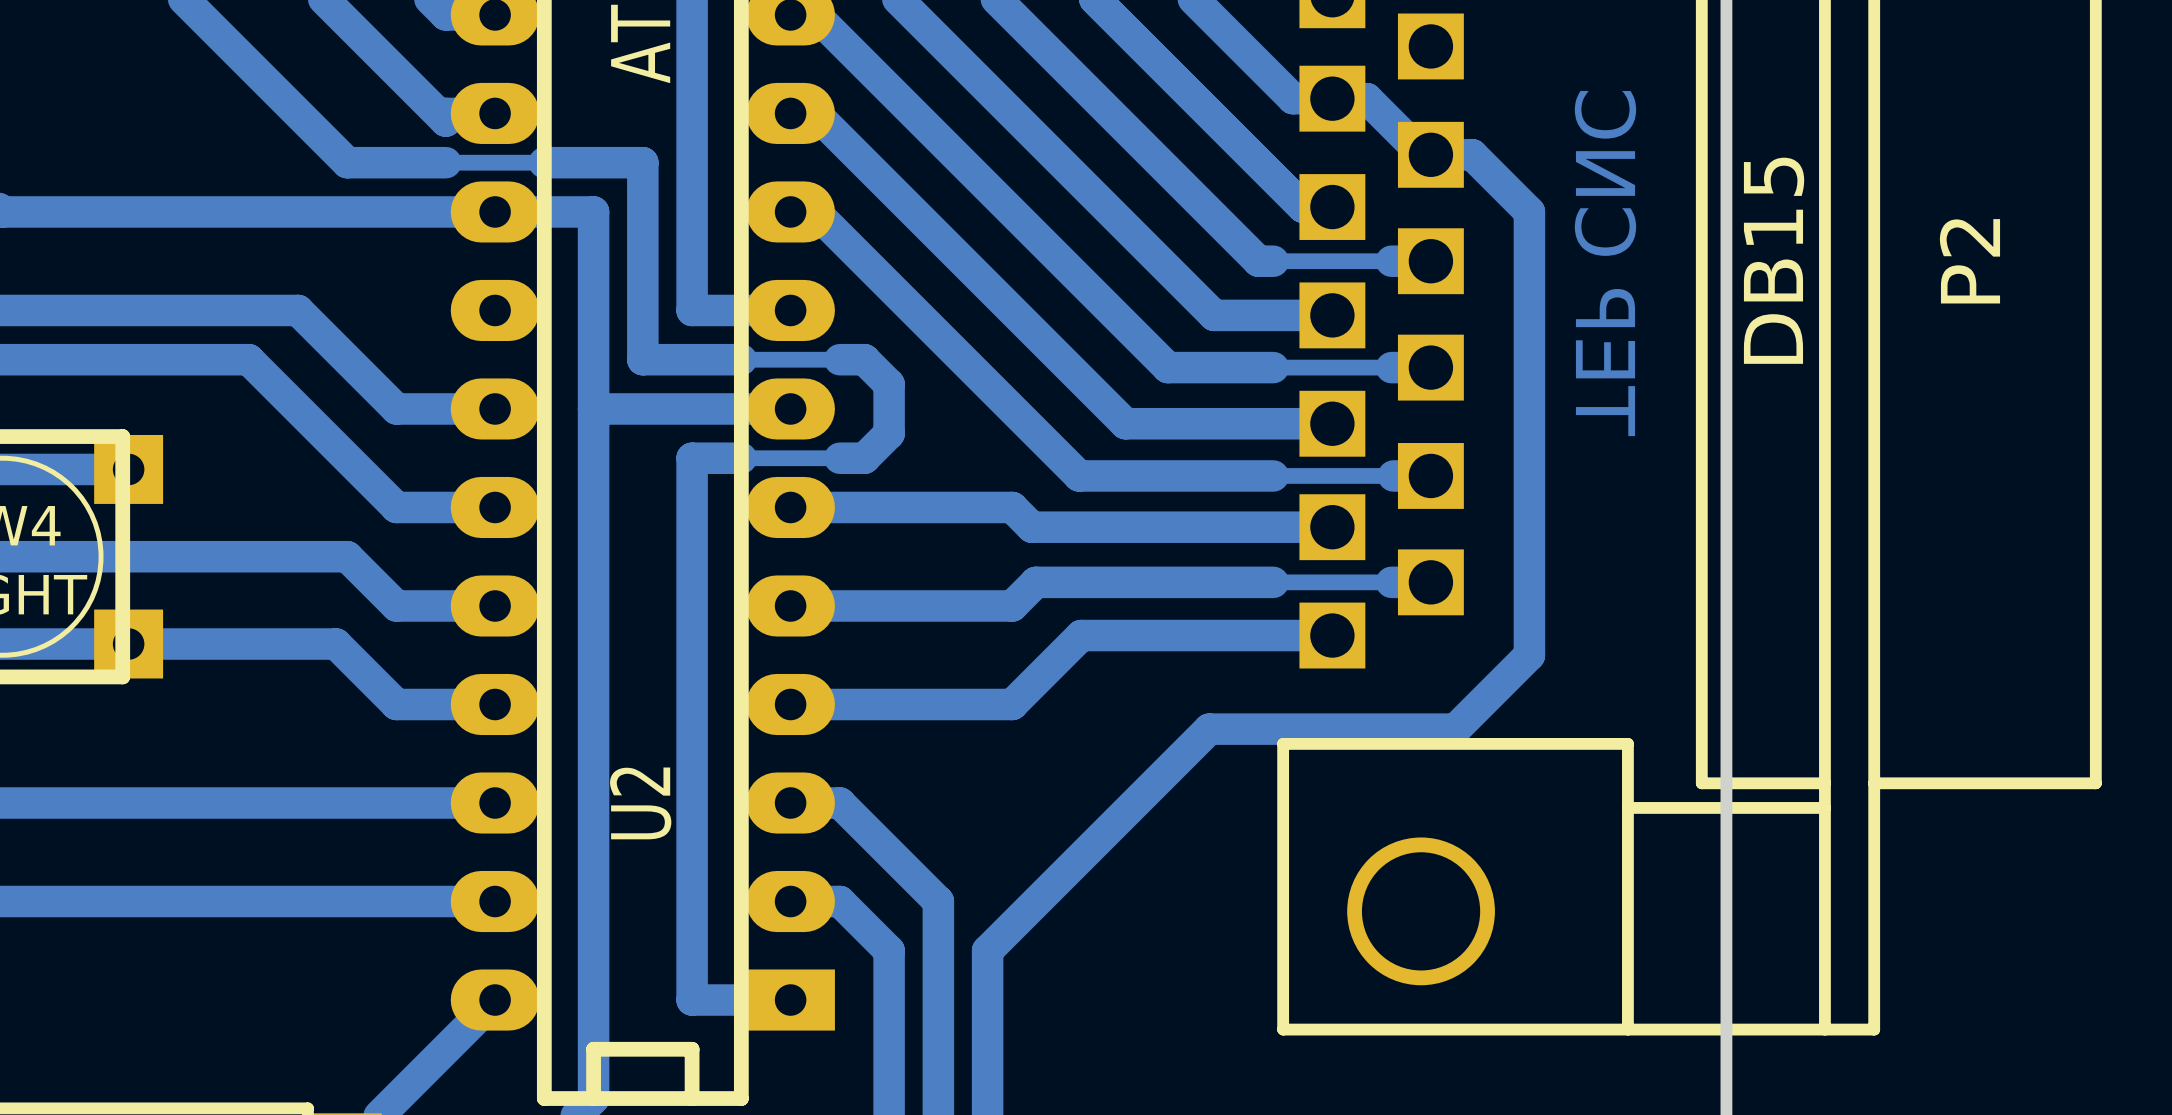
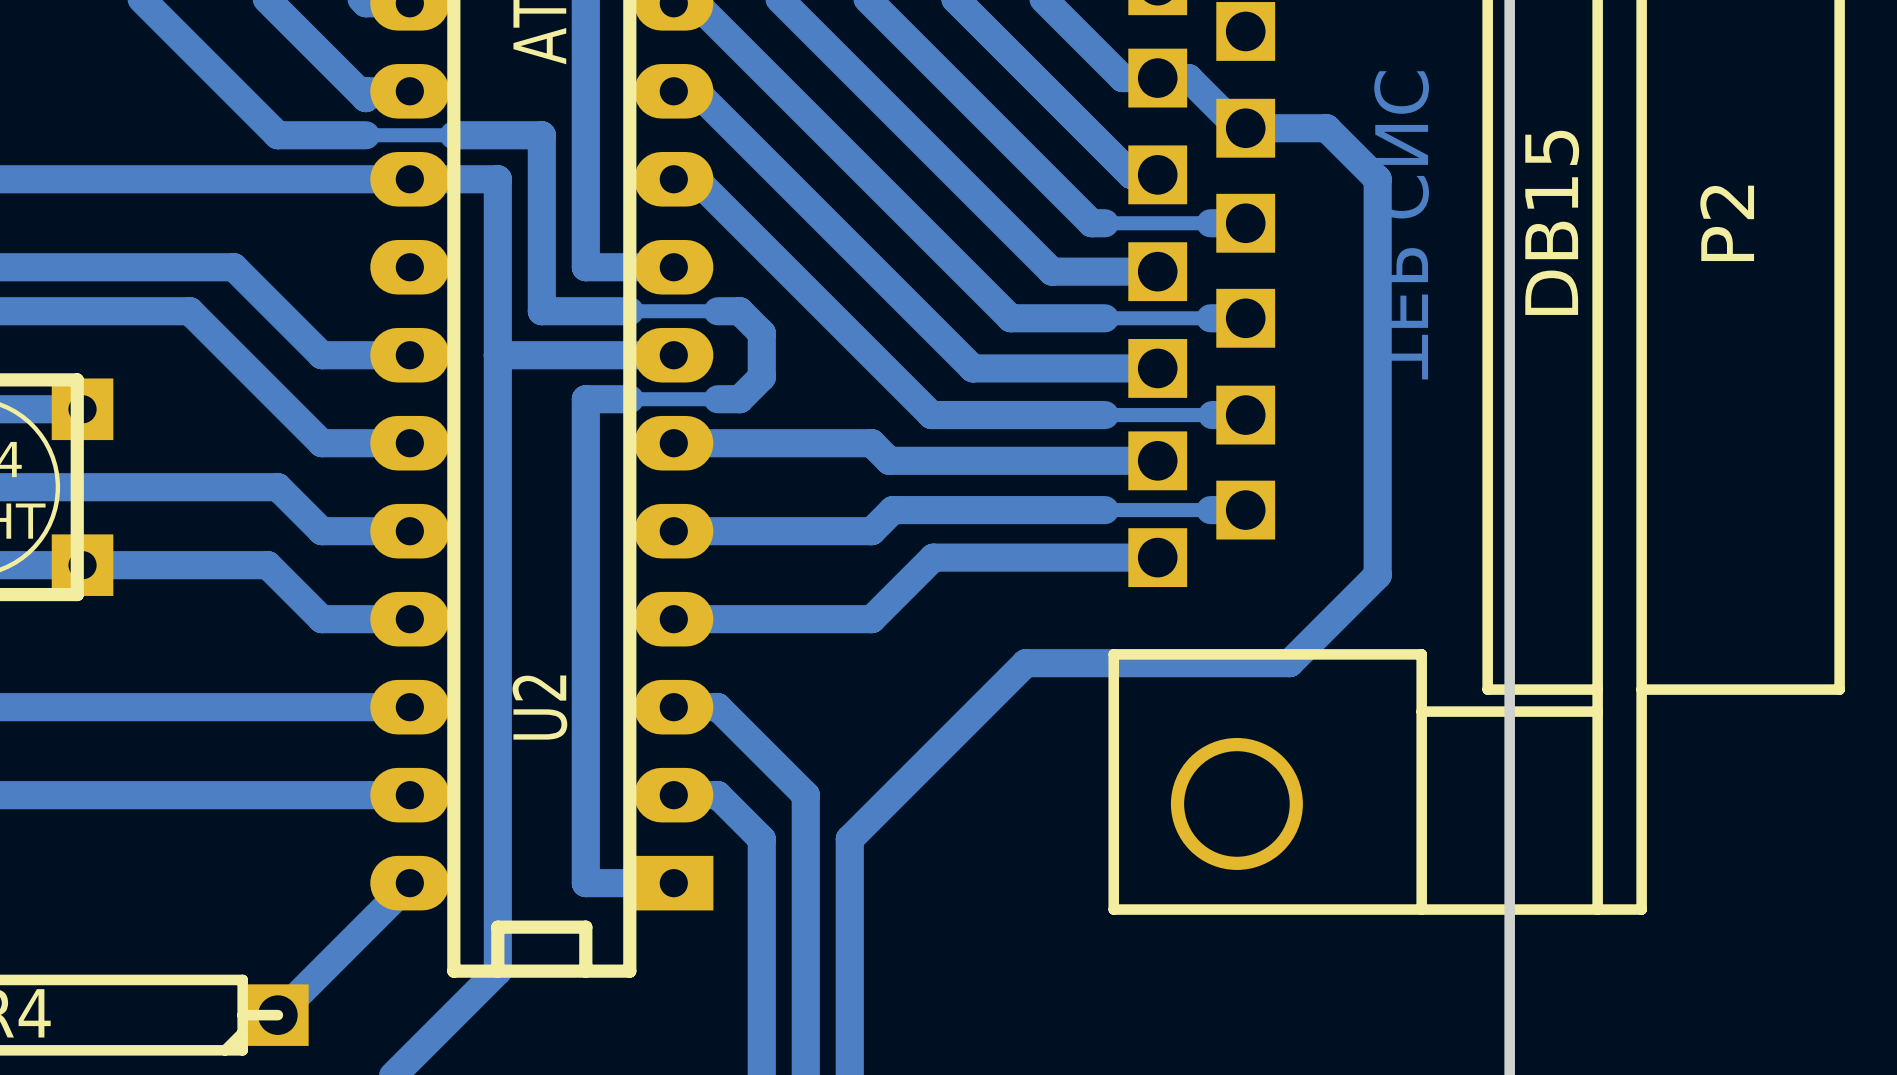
bottom track: (1472, 154) (1529, 211) (1529, 655) (1455, 729) (1209, 729) (1184, 753) -> (1282, 128) (1326, 128) (1377, 179) (1377, 575) (1289, 663) (1025, 663)

